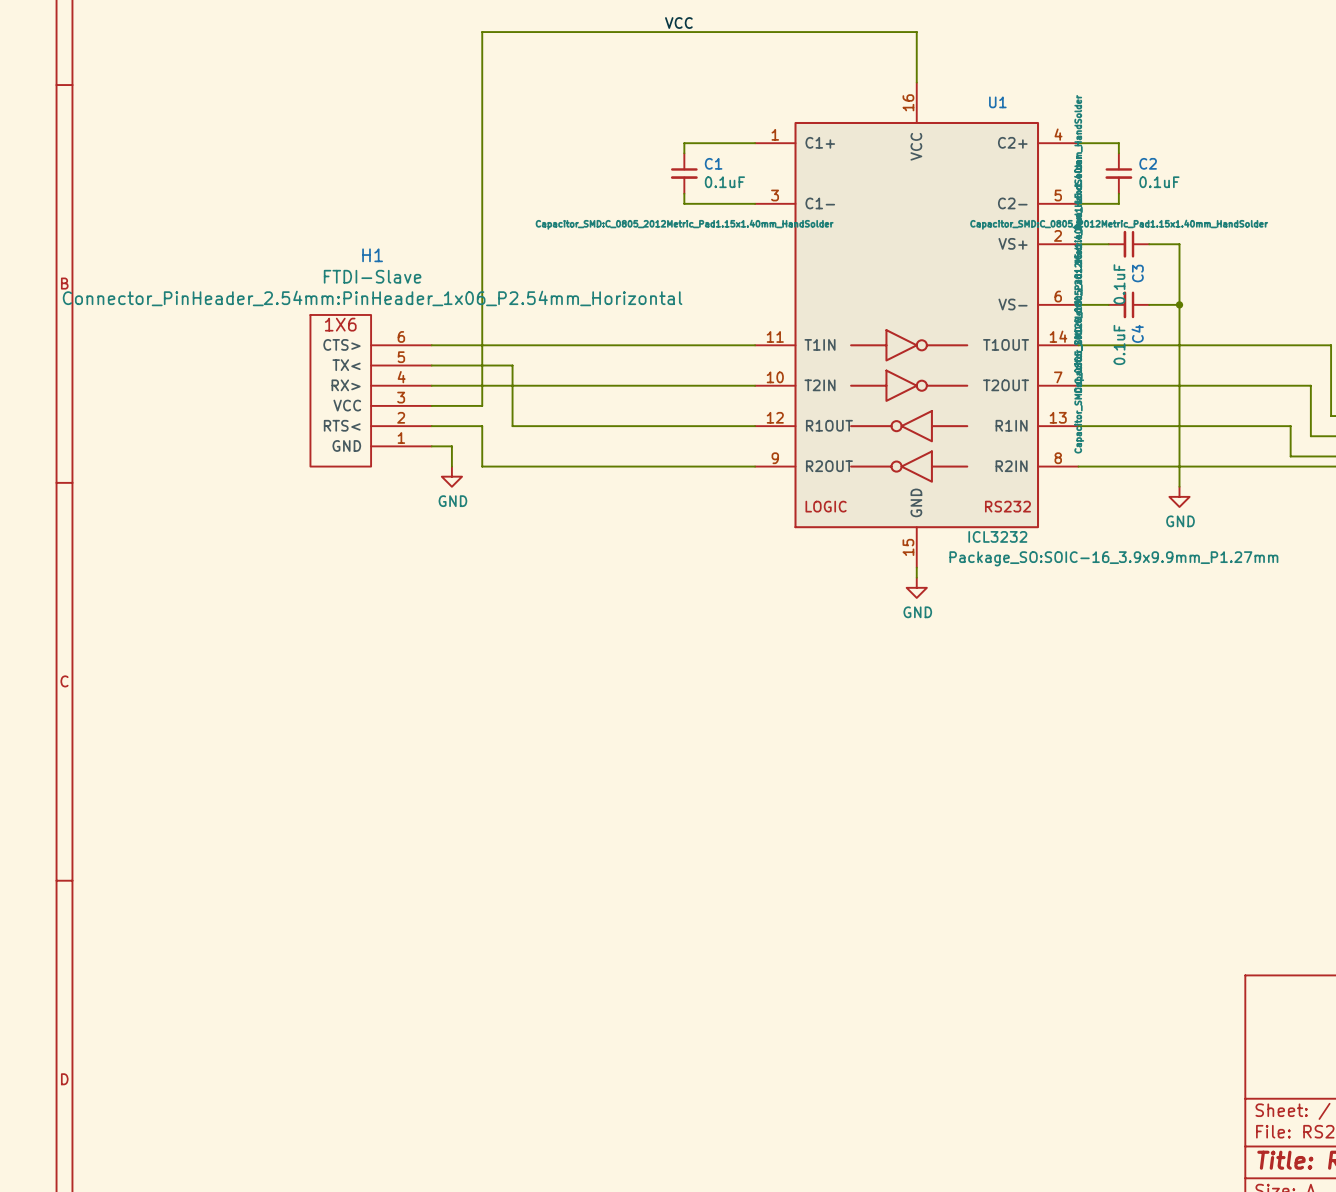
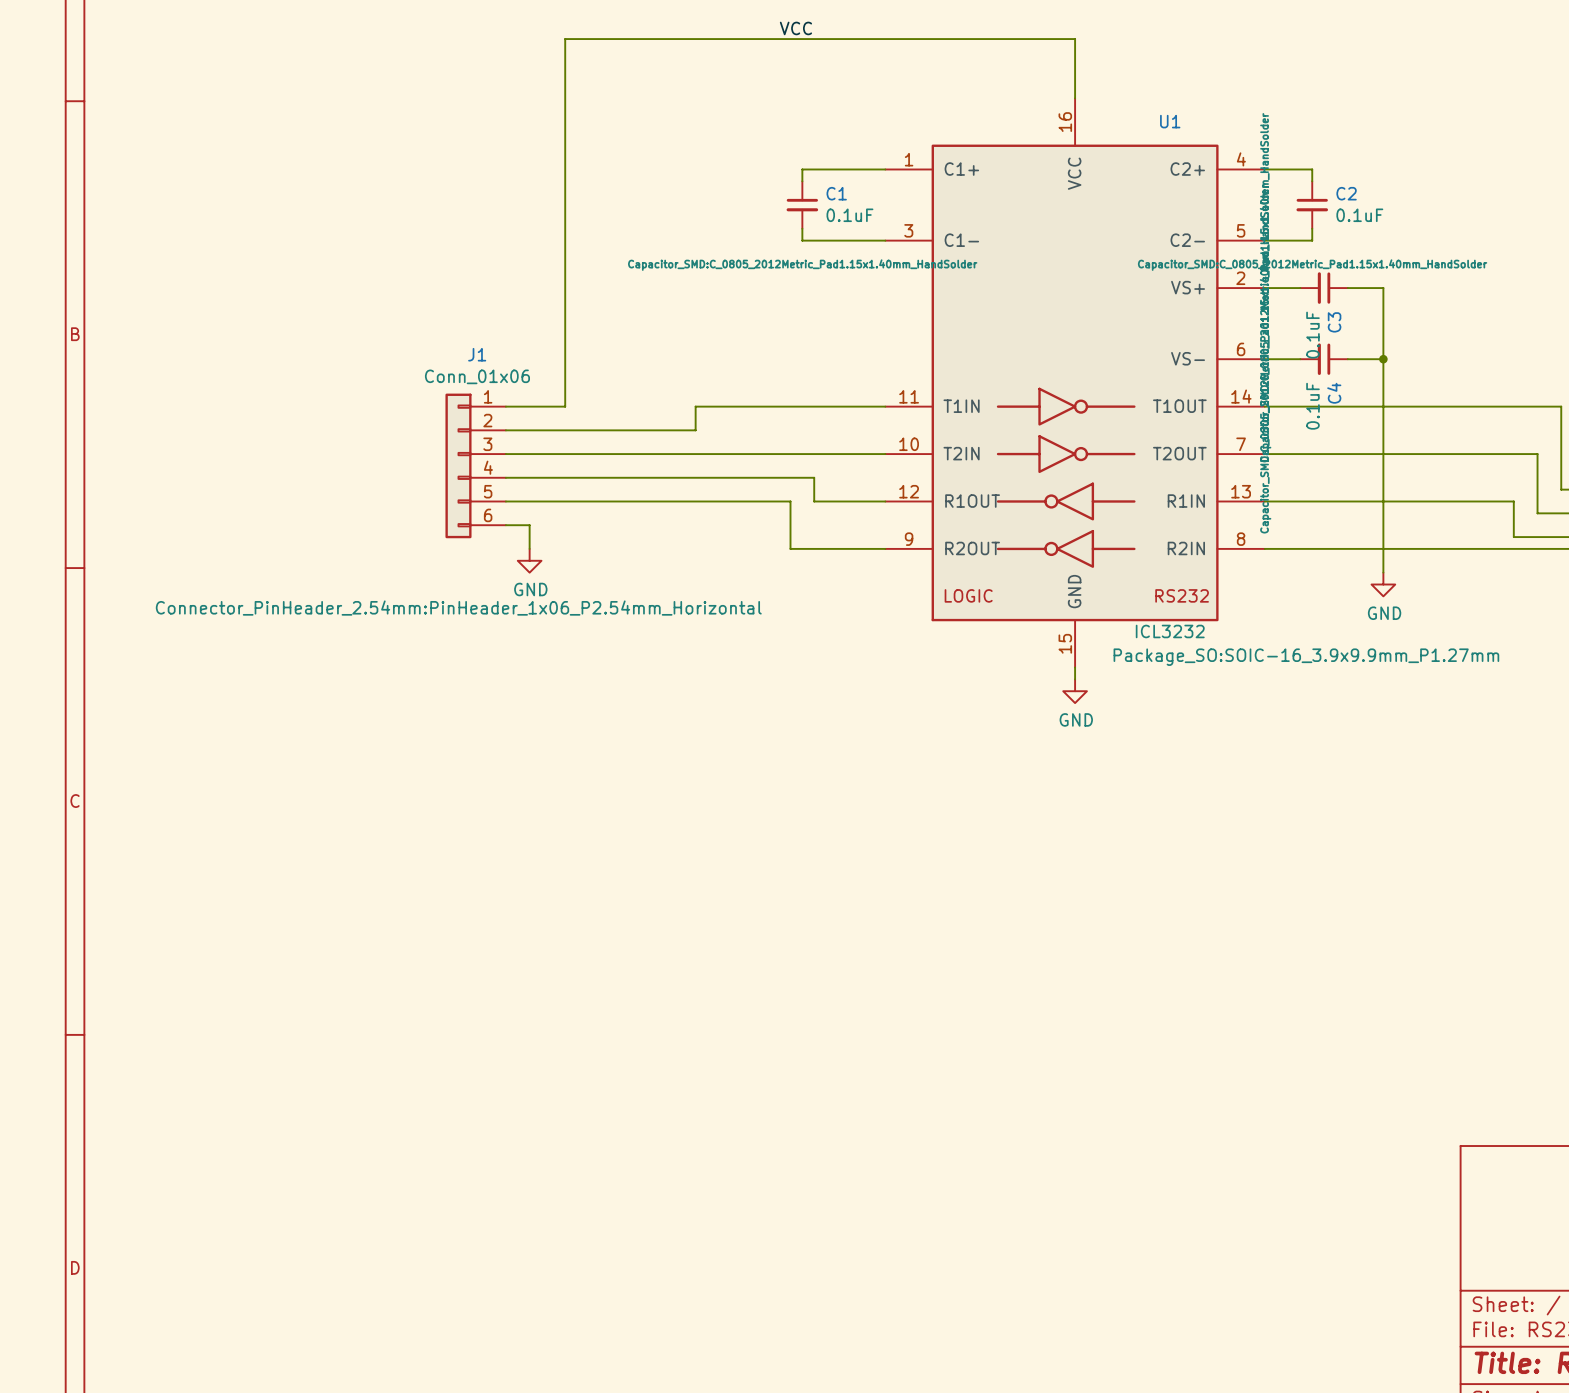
wire: (593, 345) (482, 345) (482, 405) -> (695, 406) (695, 430) (600, 430)
wire: (512, 365) (512, 426) -> (565, 501) (600, 501)
H1: FTDI-Slave (371, 390) -> none
J1: none -> Conn_01x06 (475, 465)
wire: none -> (565, 477) (814, 477) (814, 501)
wire: (482, 426) (482, 466) (674, 466) -> none
wire: (674, 426) (694, 426) -> (790, 501) (790, 548)

